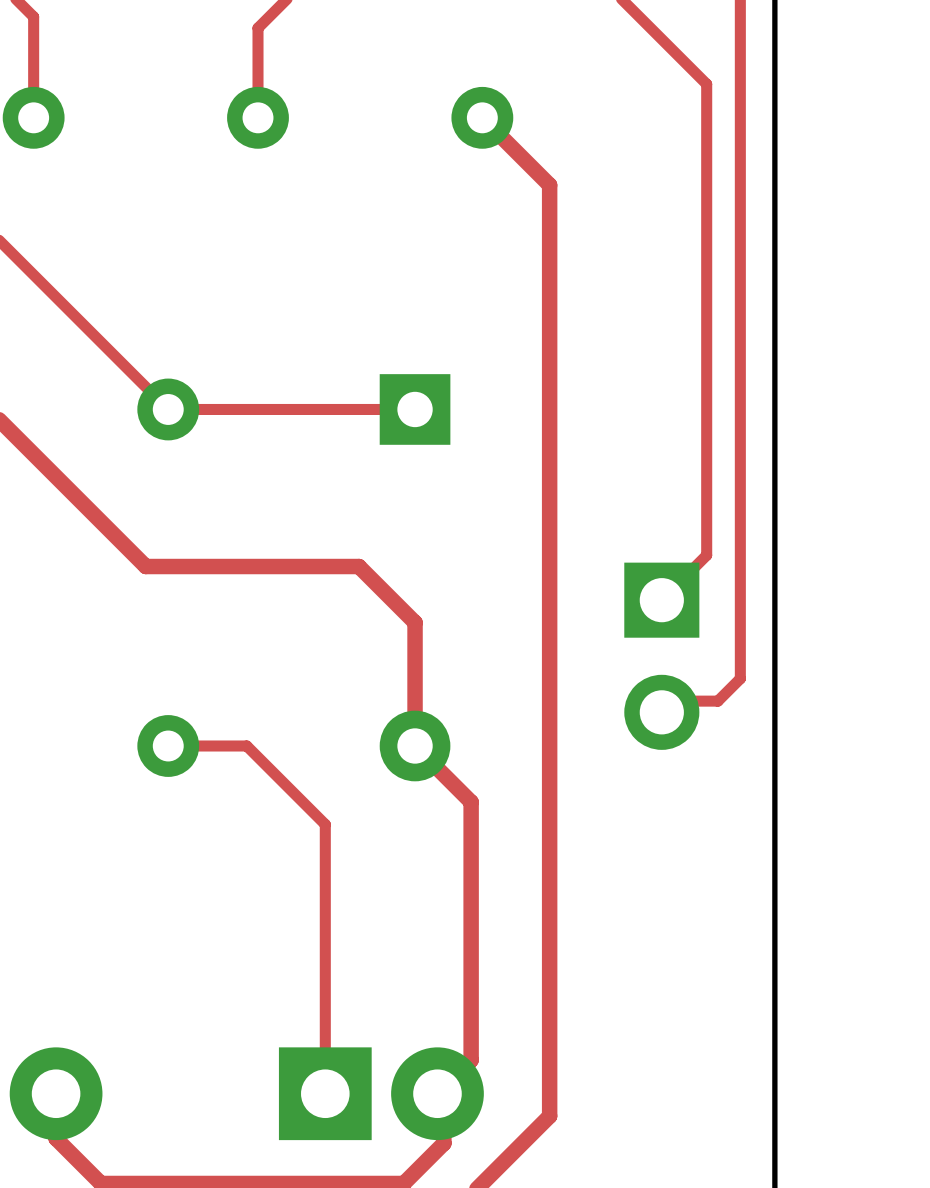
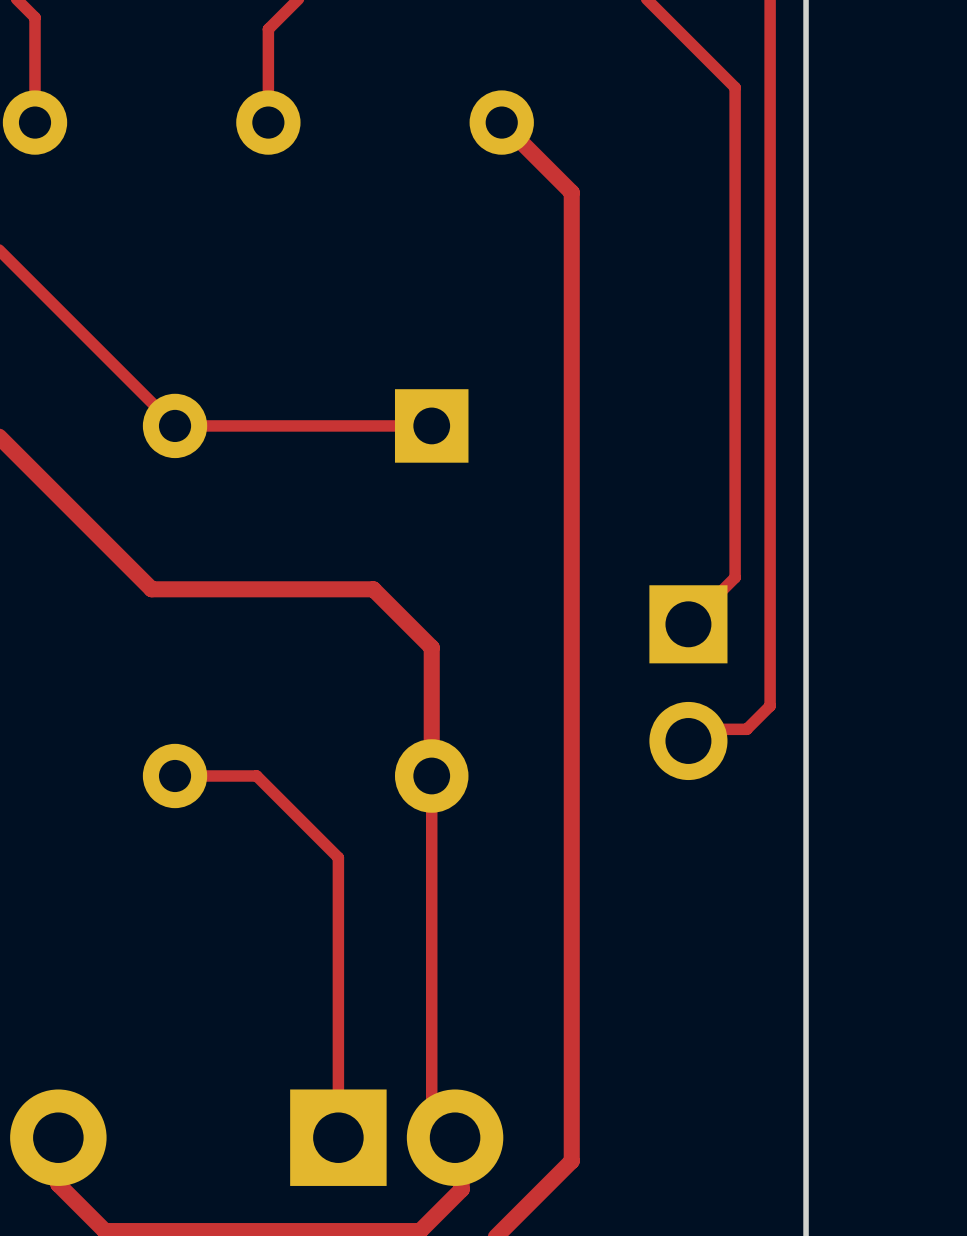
top track: (415, 745) (471, 802) (471, 1060) (437, 1093) -> (431, 775) (431, 1114) (455, 1137)

